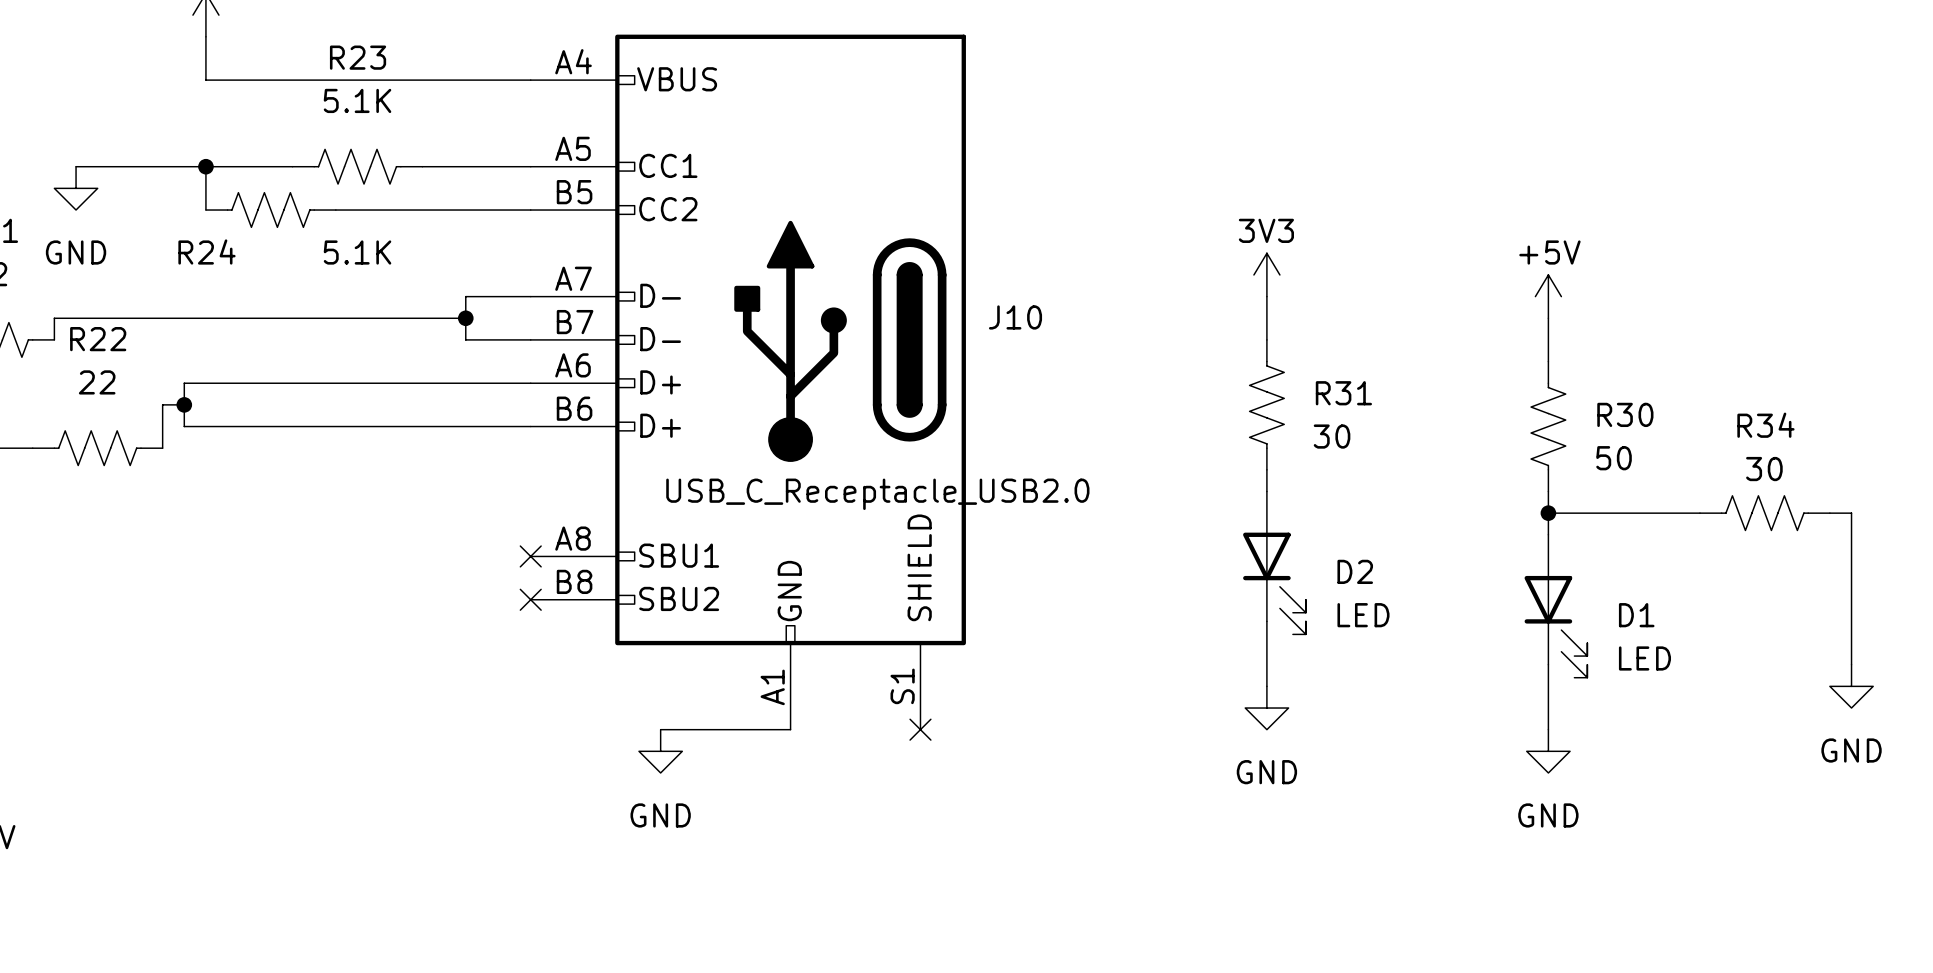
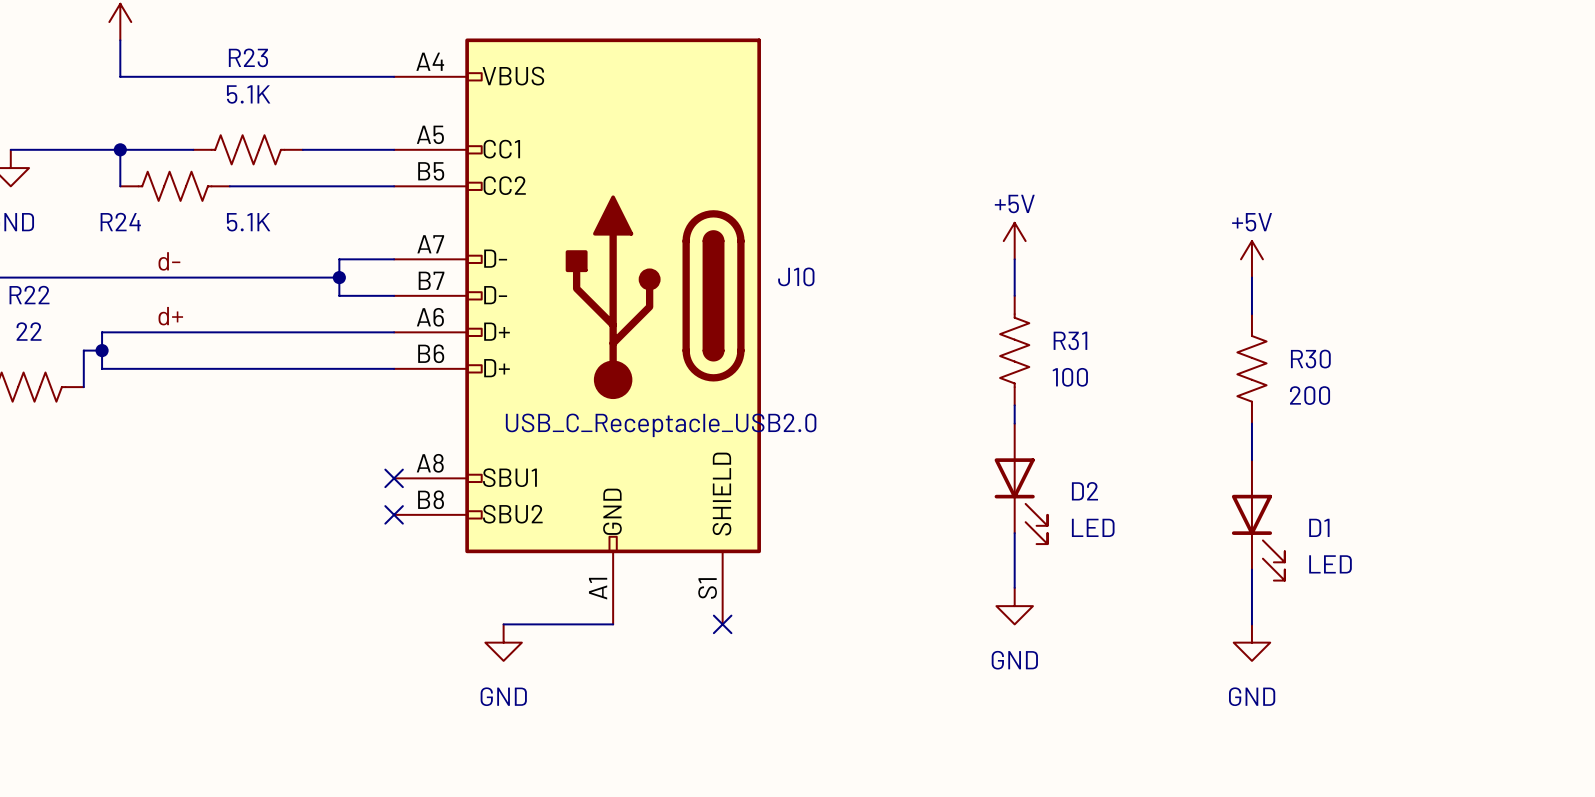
power symbol: 3V3 (1266, 274) -> +5V (1014, 241)
label: none -> d- (169, 261)
label: none -> d+ (170, 316)
R31 value: 30 (1332, 436) -> 100 (1070, 377)
R30 value: 50 (1614, 458) -> 200 (1310, 395)
wire: (1548, 513) (1699, 513) -> none
junction: (1548, 513) -> none
R34: 30 (1764, 513) -> none
wire: (1829, 513) (1851, 513) (1851, 664) -> none
power symbol: GND (1851, 686) -> none

